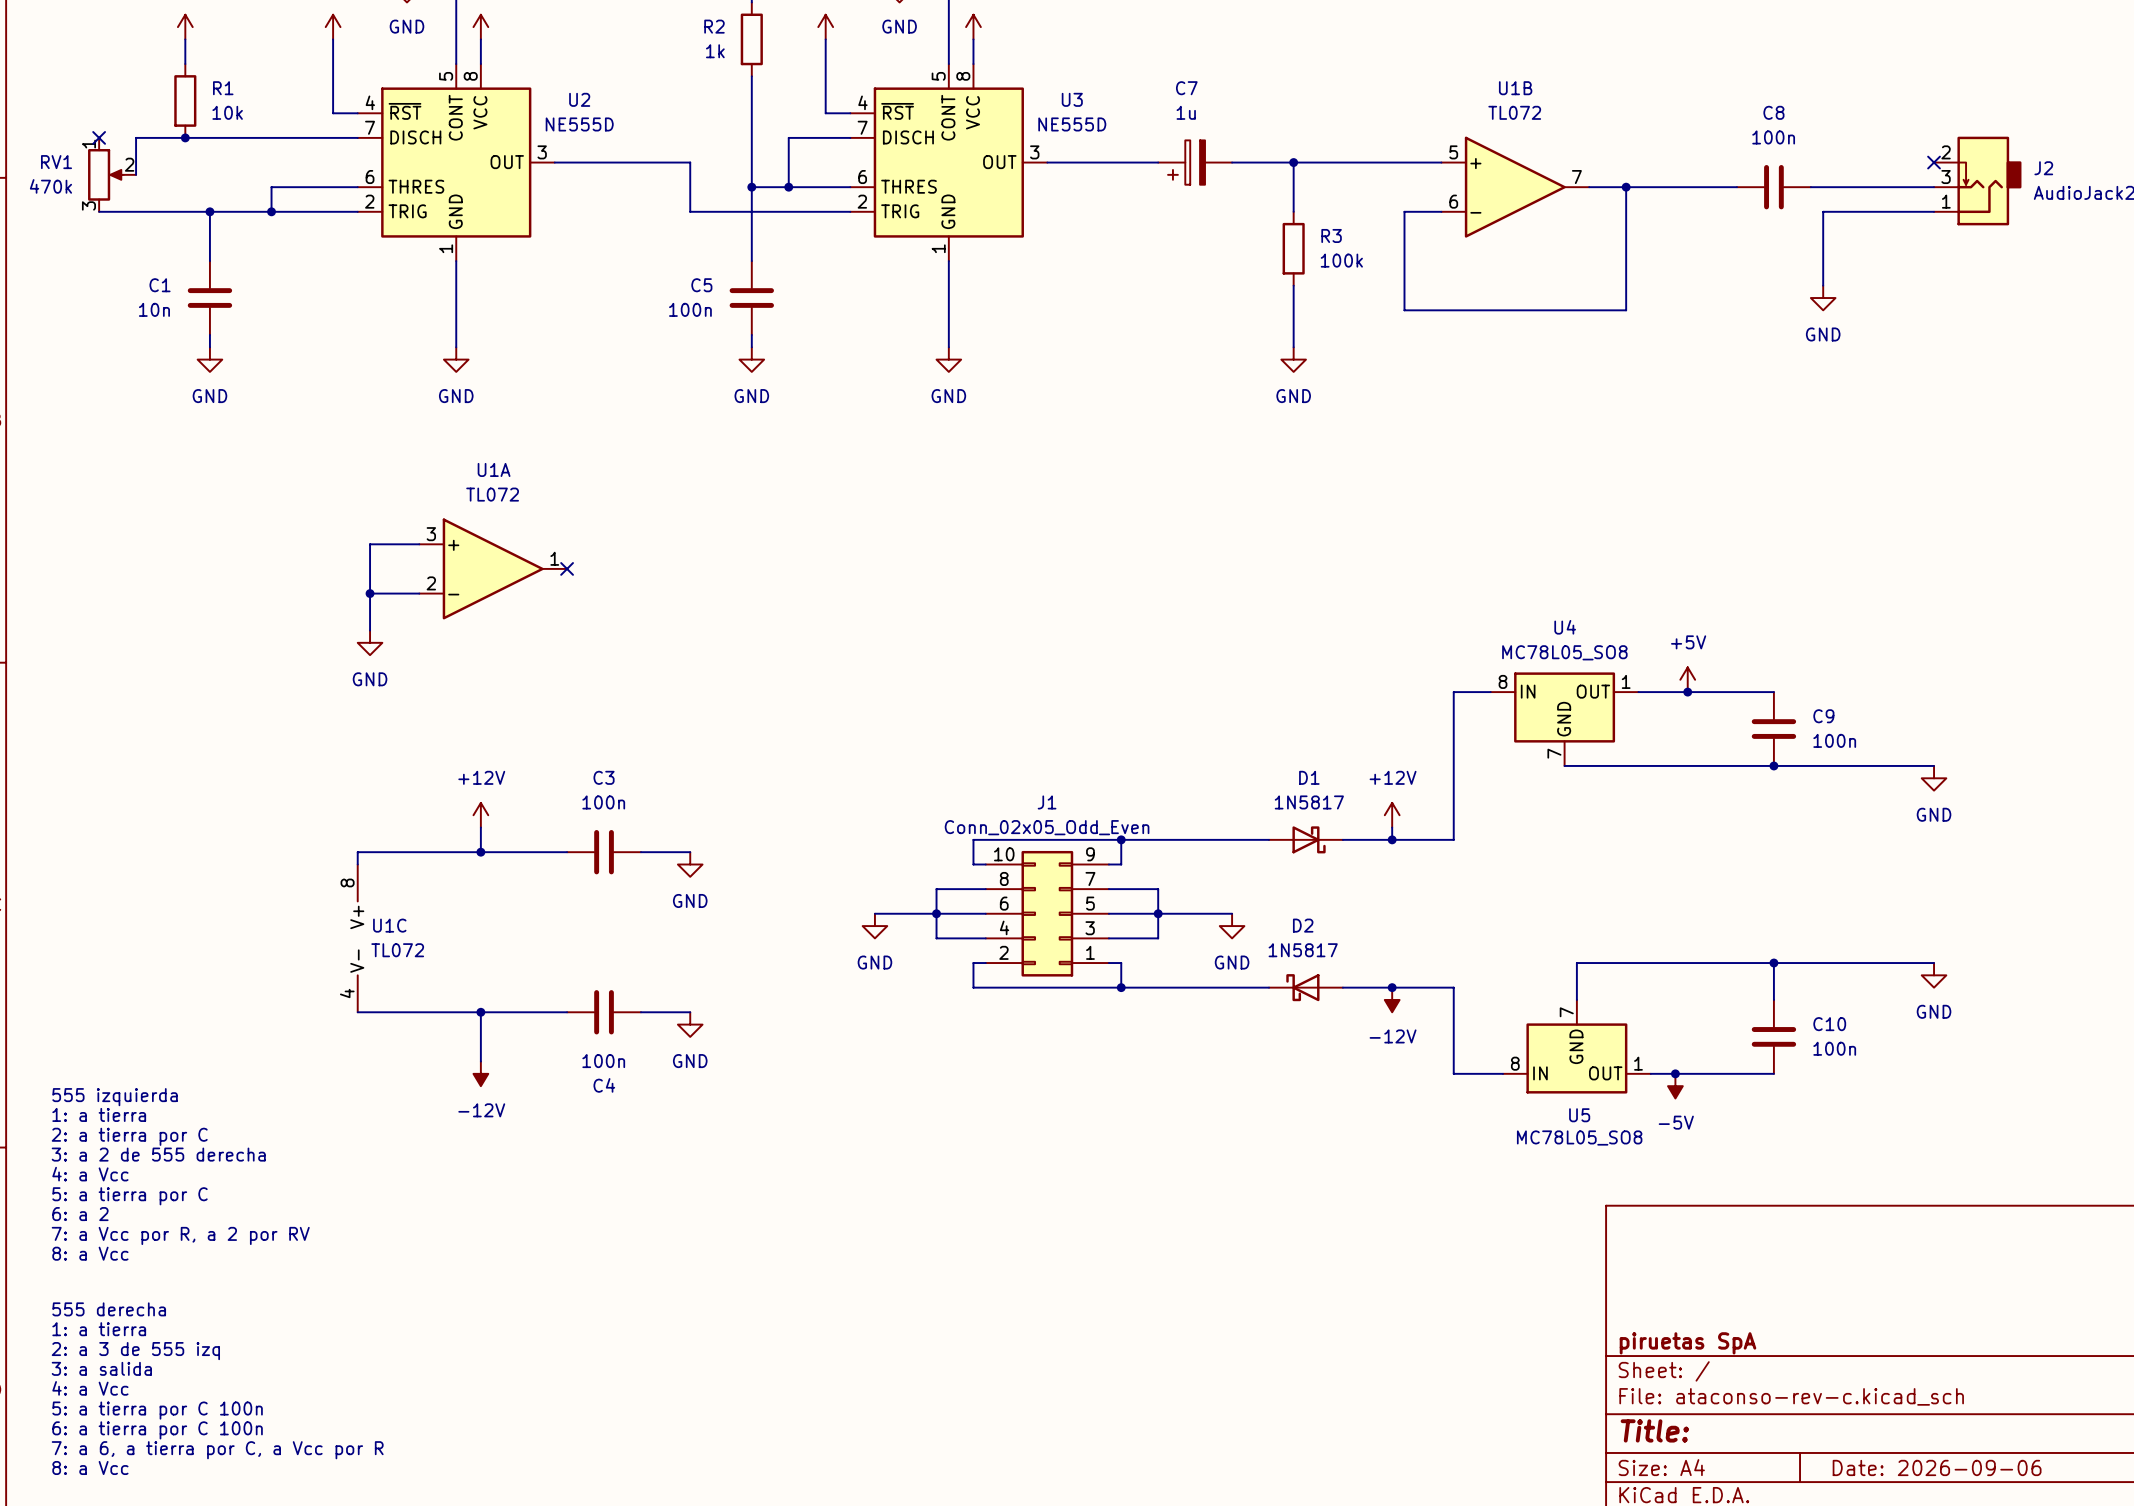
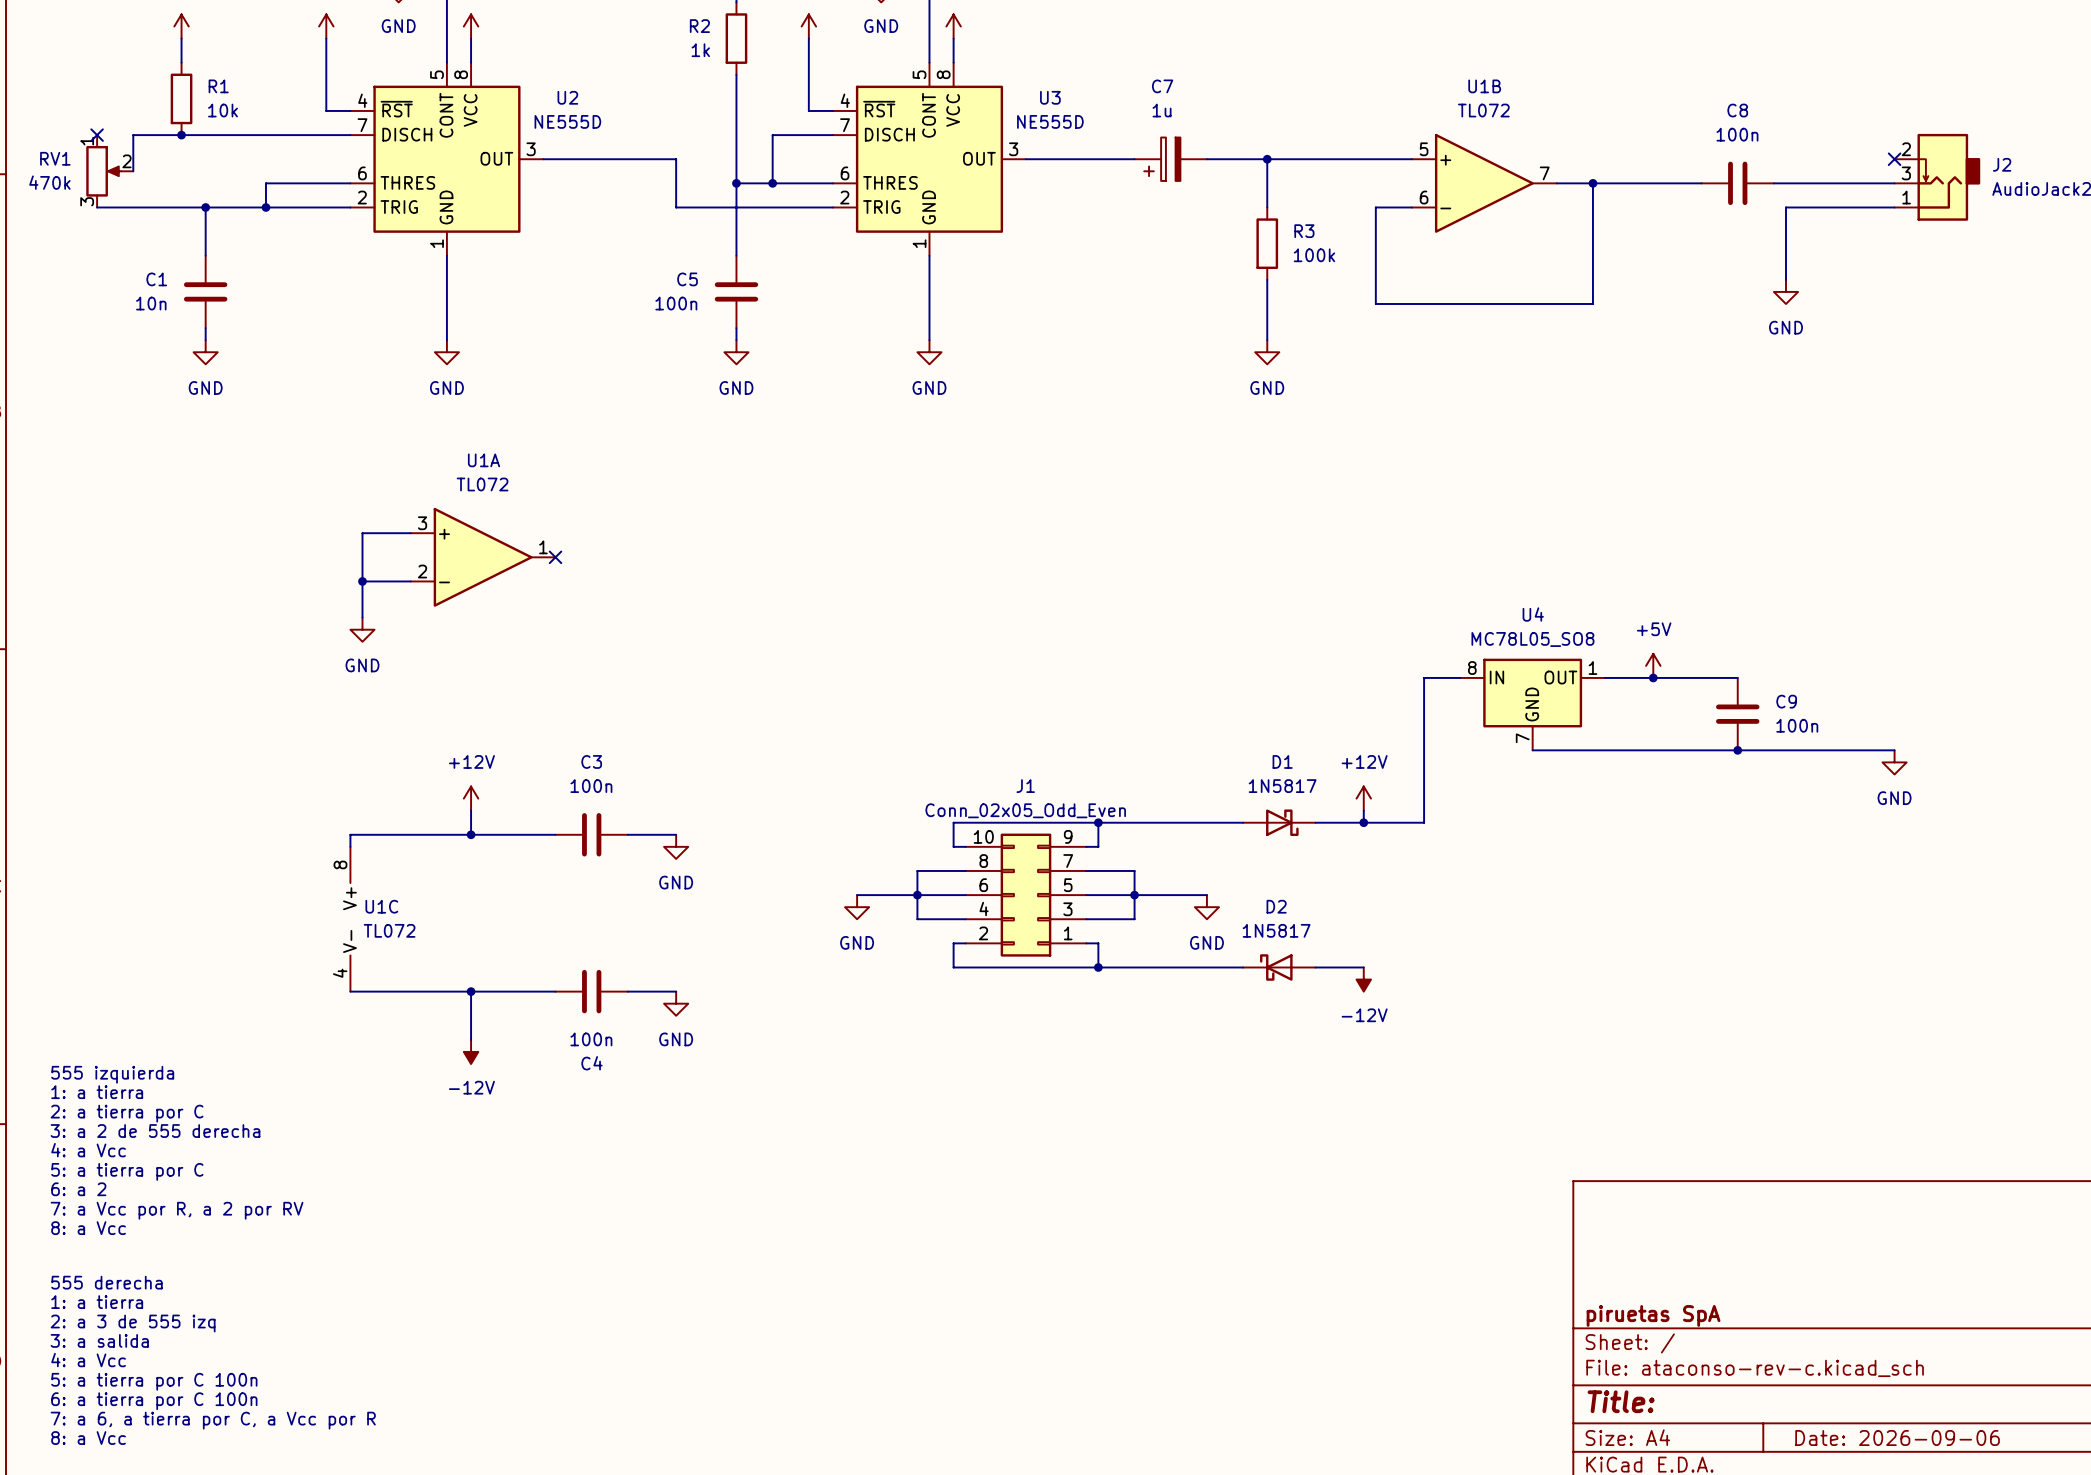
wire: (1773, 963) (1773, 999) -> none
junction: (1773, 963) -> none
wire: (1934, 963) (1576, 963) (1576, 999) -> none
power symbol: GND (1934, 975) -> none
wire: (1392, 987) (1453, 987) (1453, 1073) (1503, 1073) -> none
junction: (1392, 987) -> none
C10: 100n (1773, 1036) -> none
U5: MC78L05_SO8 (1576, 1046) -> none
wire: (1650, 1073) (1773, 1073) -> none
junction: (1675, 1073) -> none
power symbol: -5V (1675, 1086) -> none

